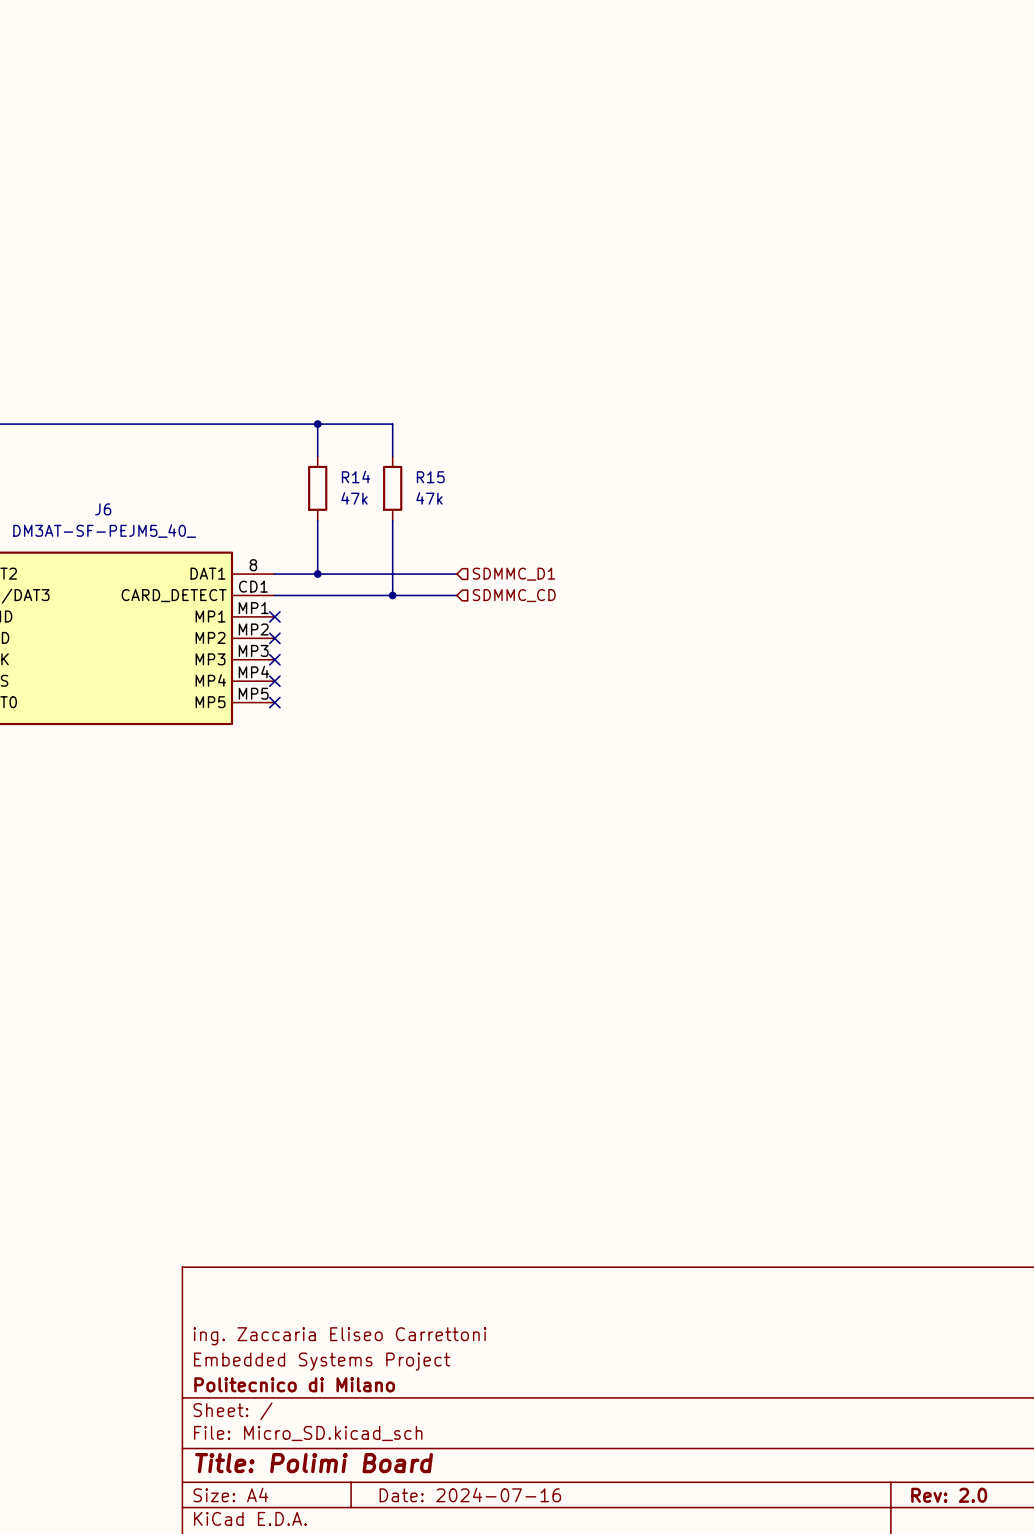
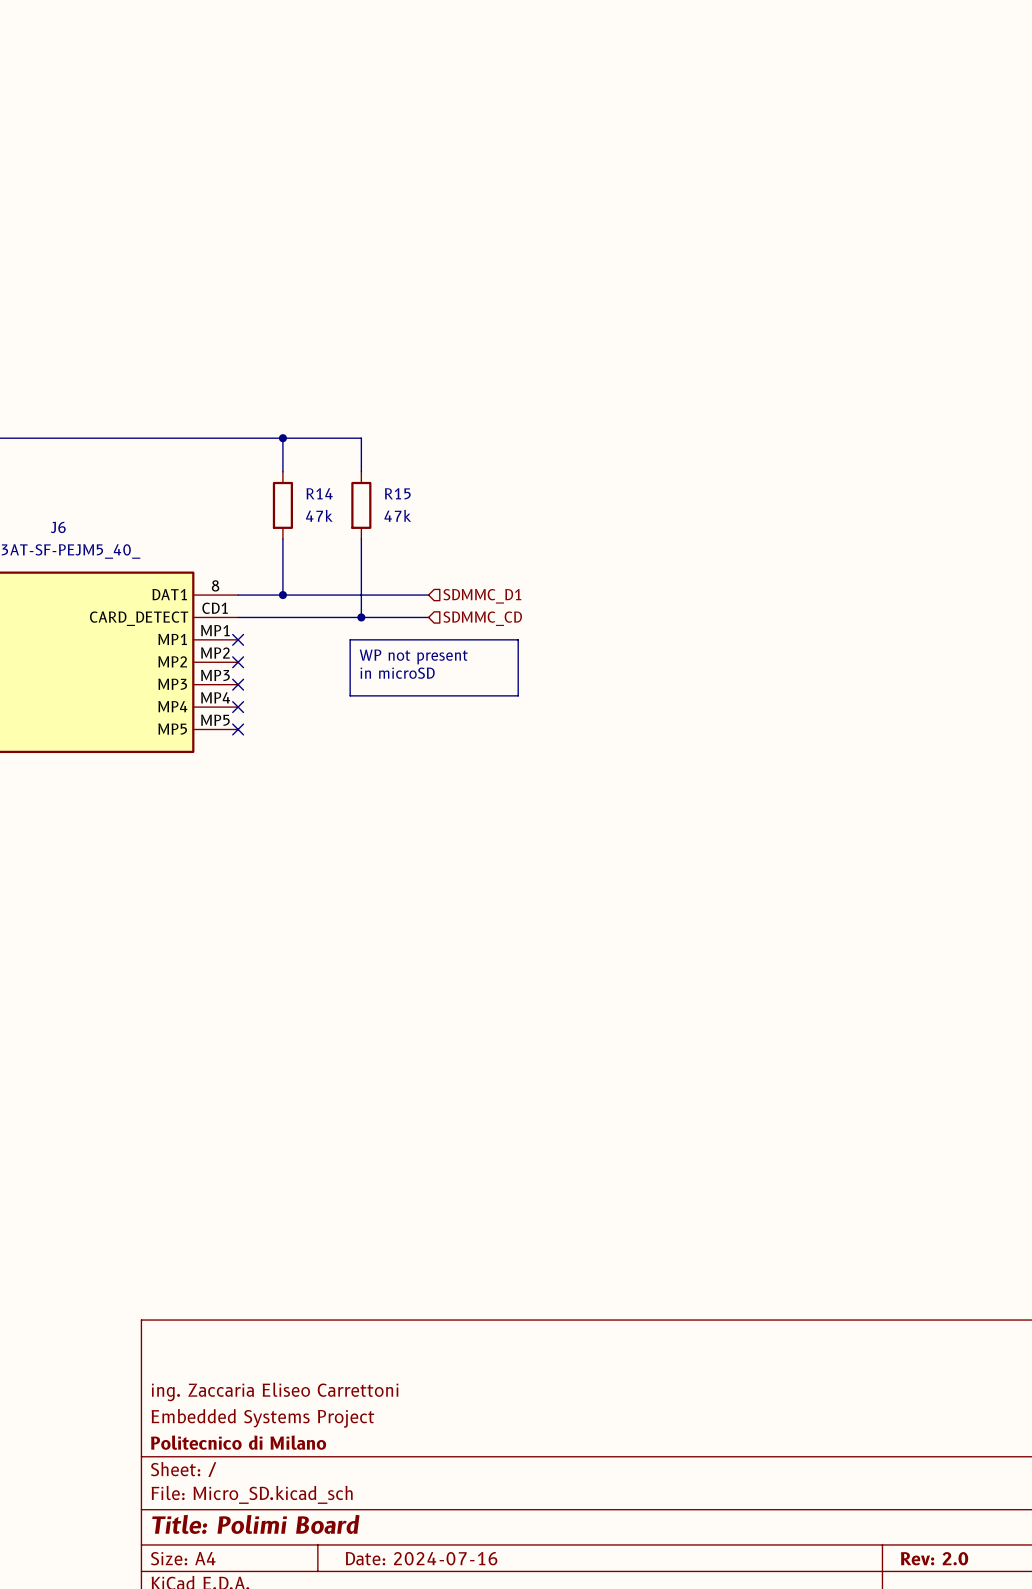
line: none -> (350, 639) (518, 639) (518, 695) (350, 695) (350, 639)
text: none -> WP not present (413, 656)
text: none -> in microSD (397, 673)

